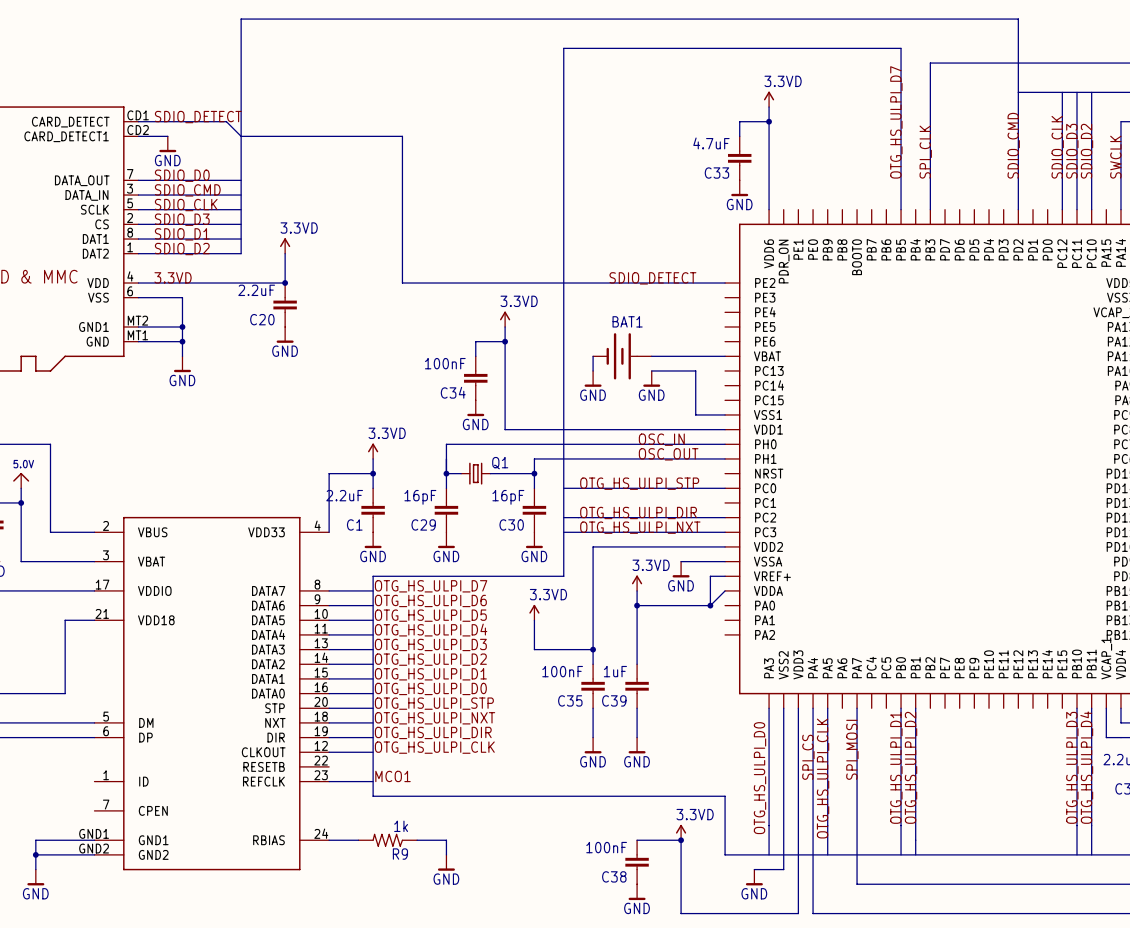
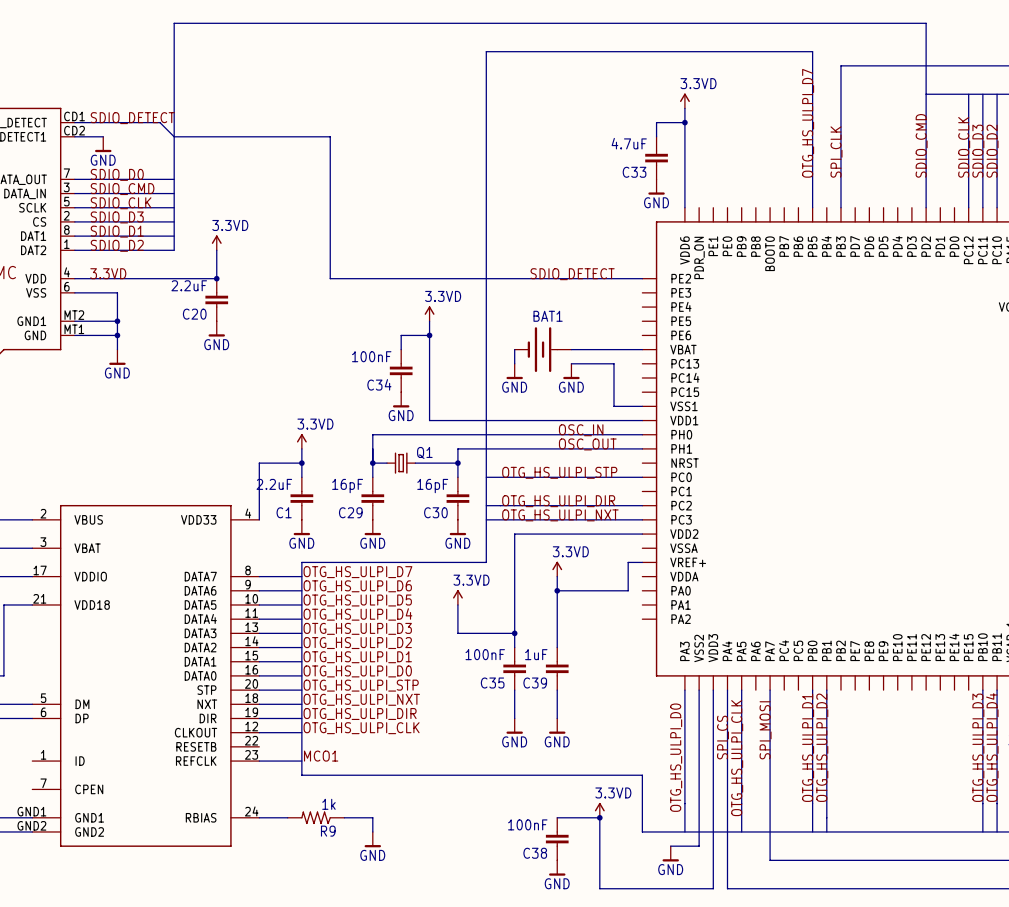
wire: (681, 561) (725, 561) -> none
power symbol: GND (681, 569) -> none
wire: (725, 590) (710, 605) -> none
junction: (710, 605) -> none

